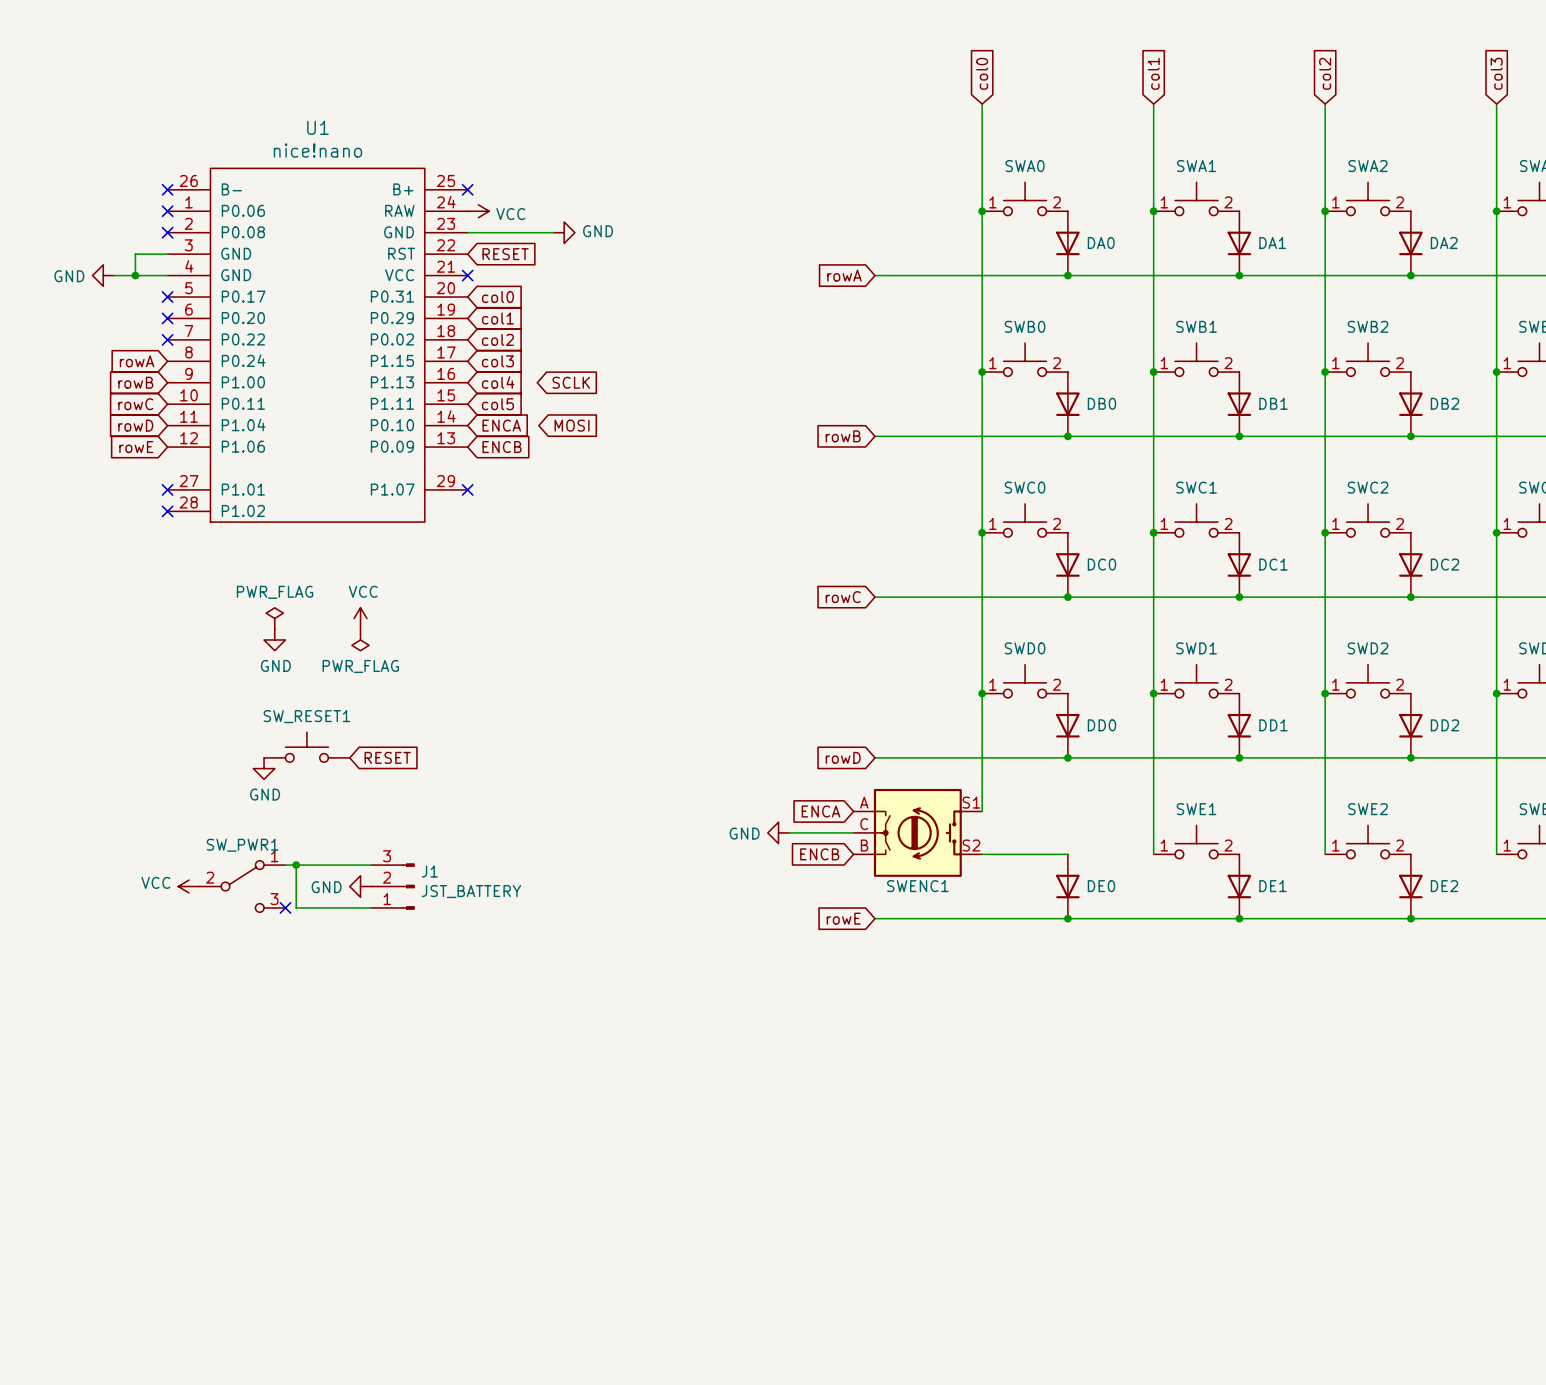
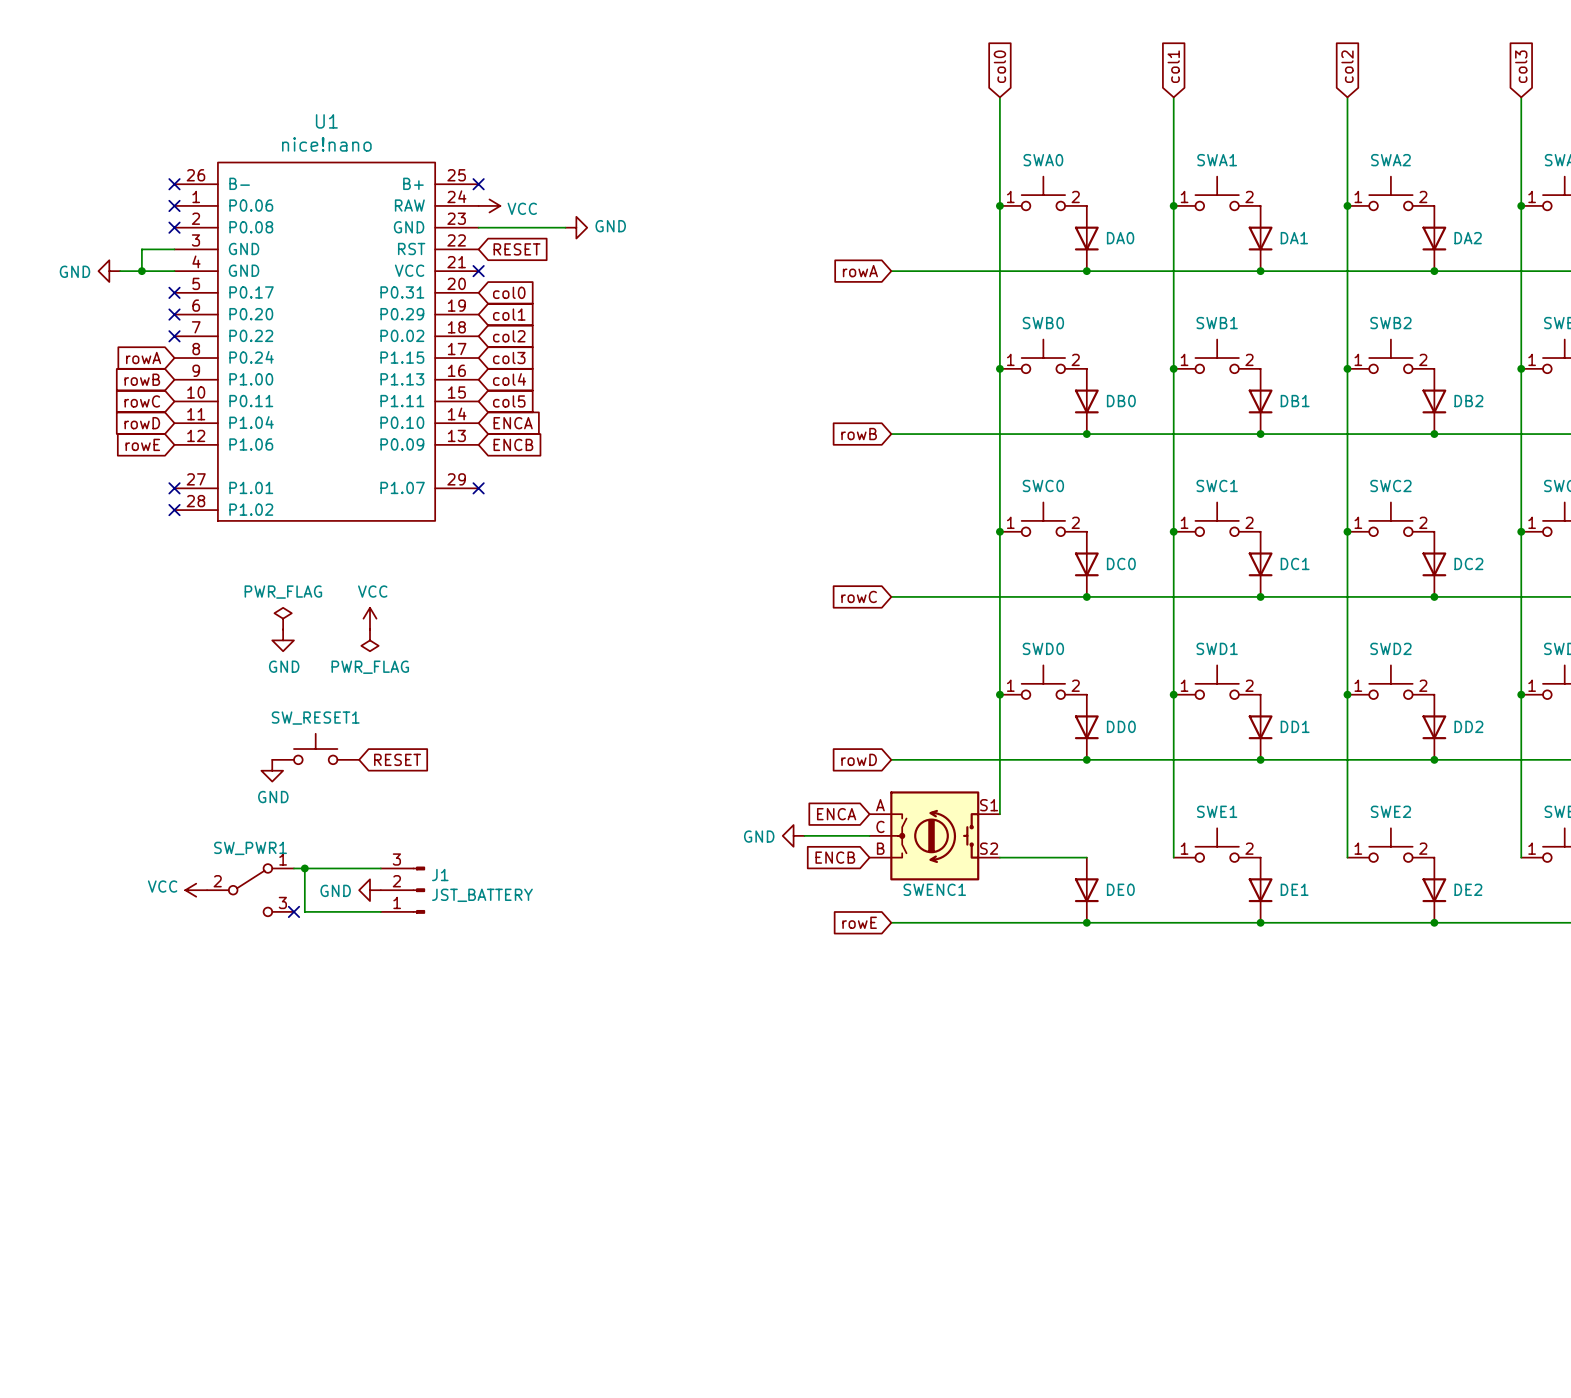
global label: SCLK (571, 382) -> none
global label: MOSI (572, 425) -> none

